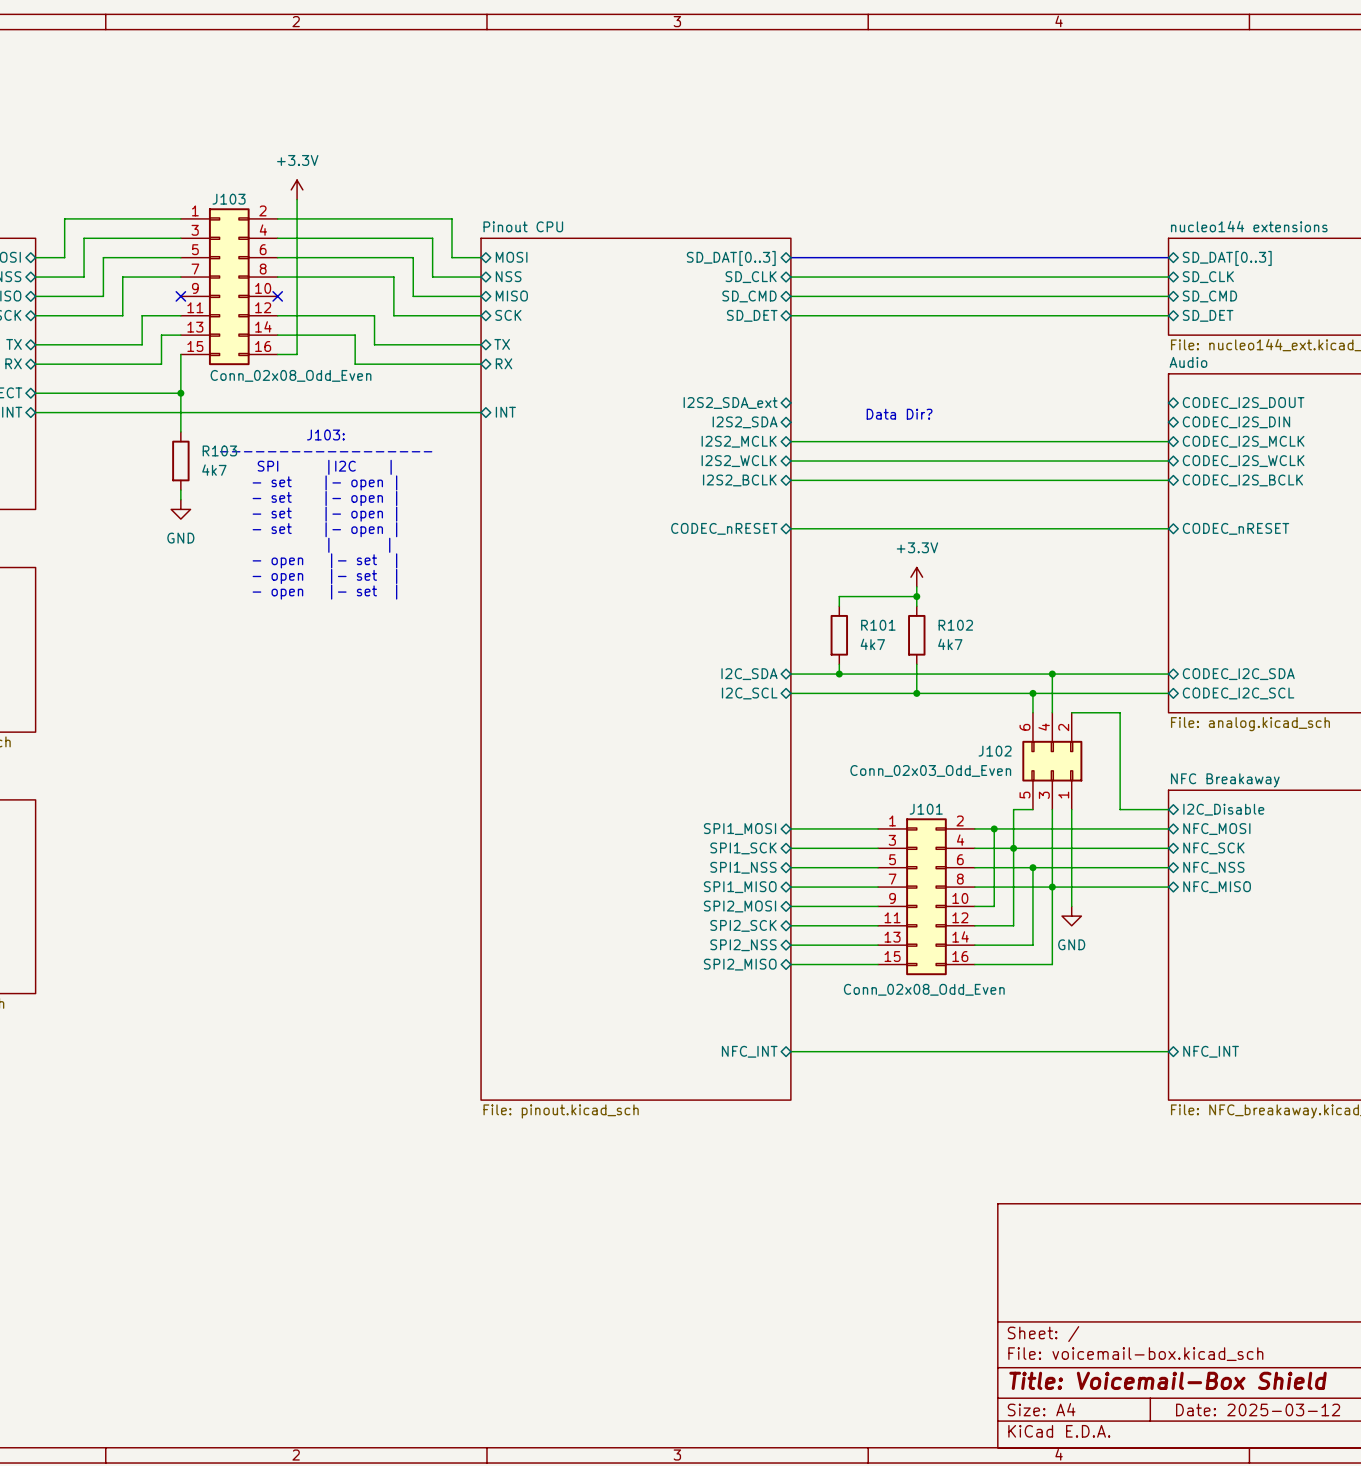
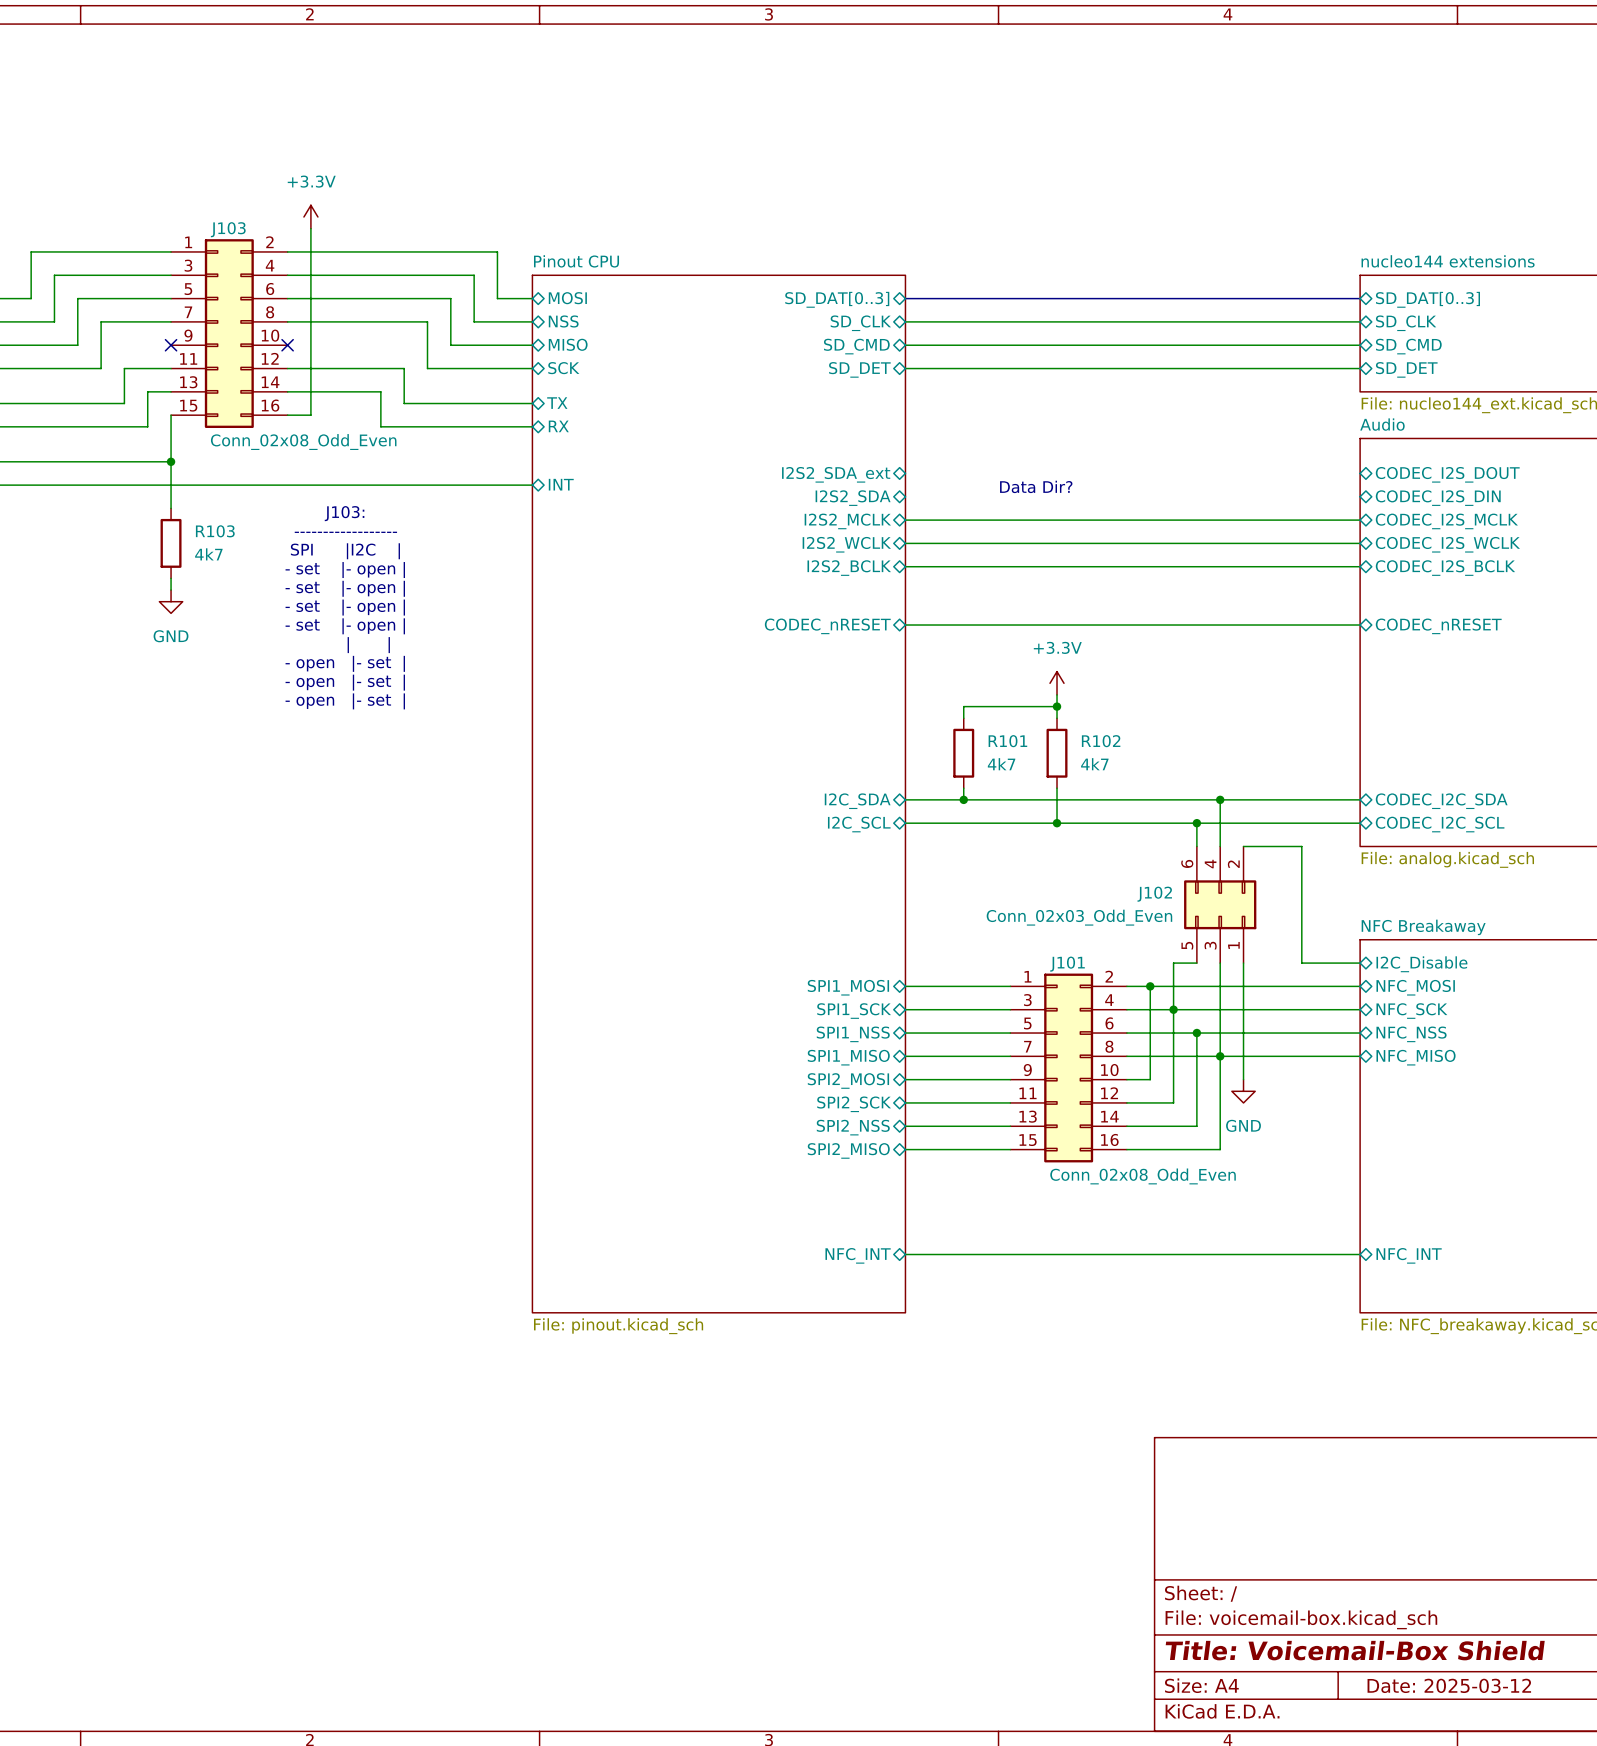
J101 value position: Conn_02x08_Odd_Even (924, 989) -> Conn_02x08_Odd_Even (1143, 1176)

